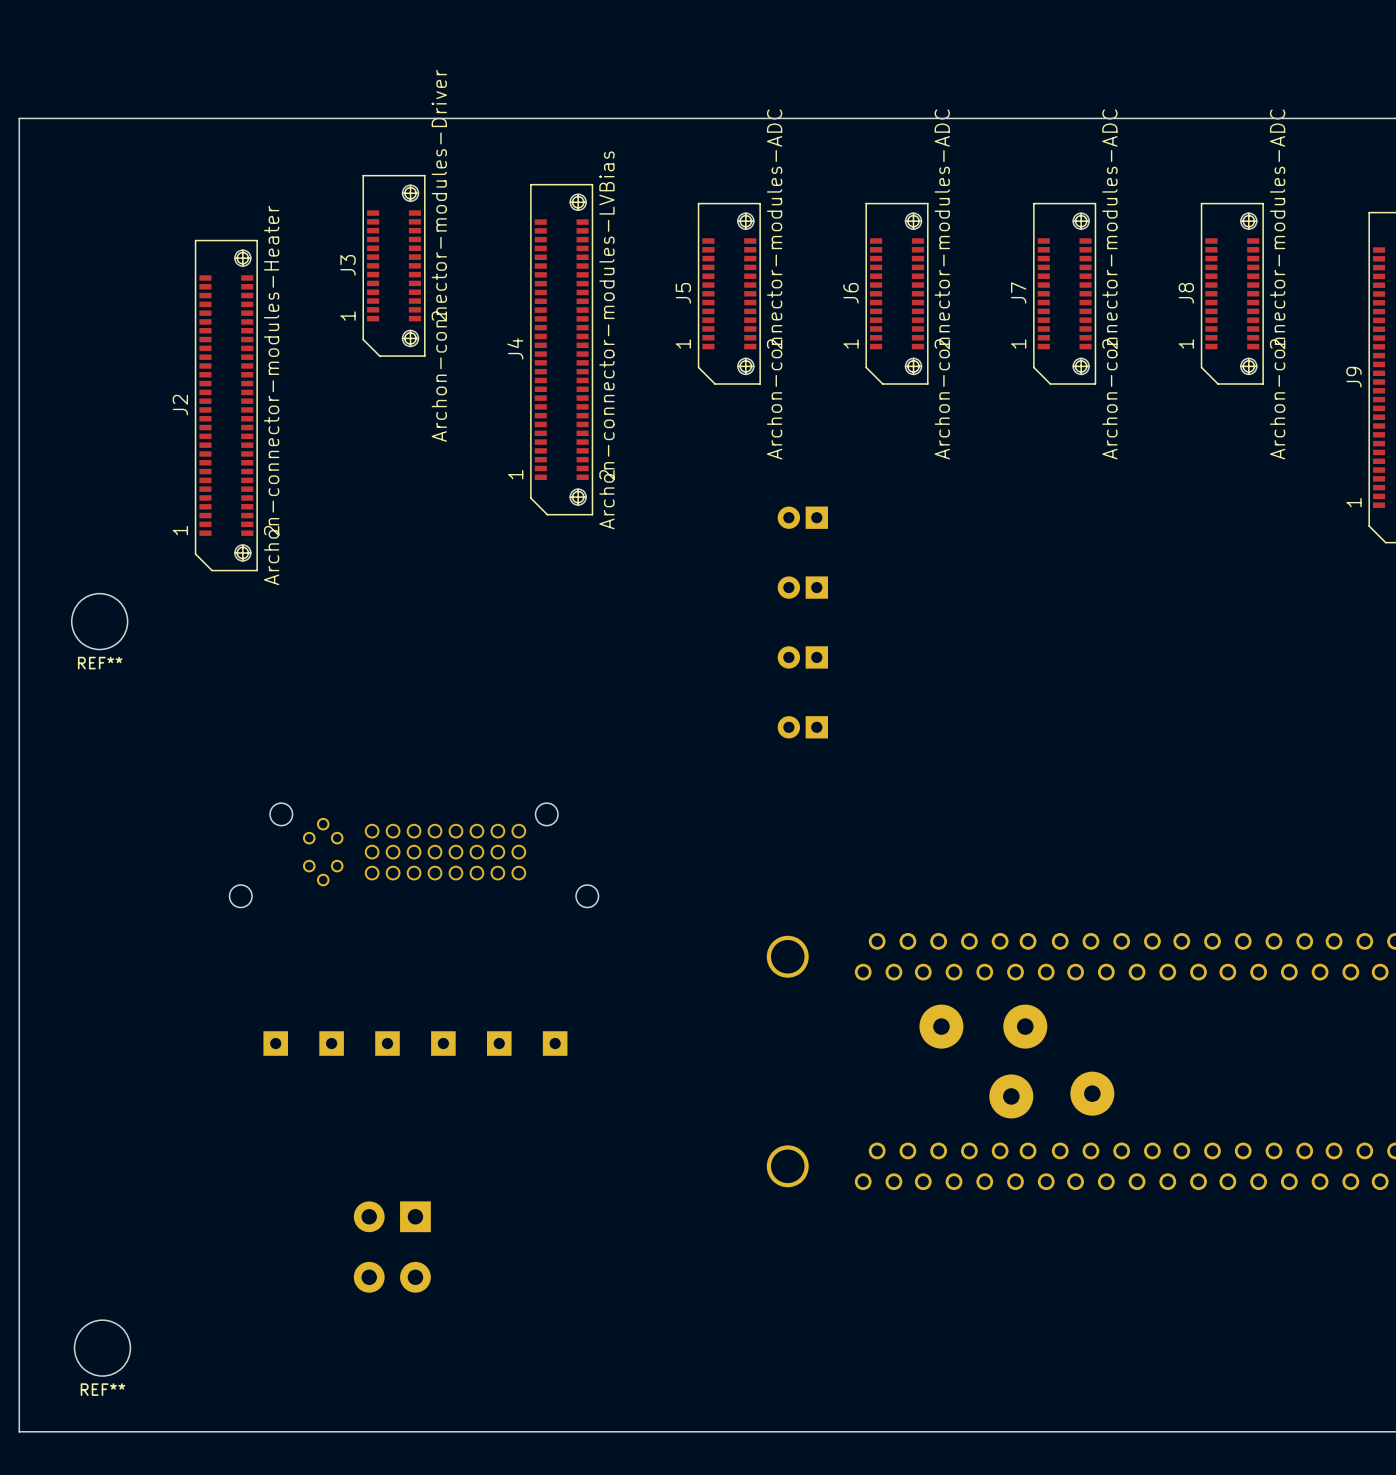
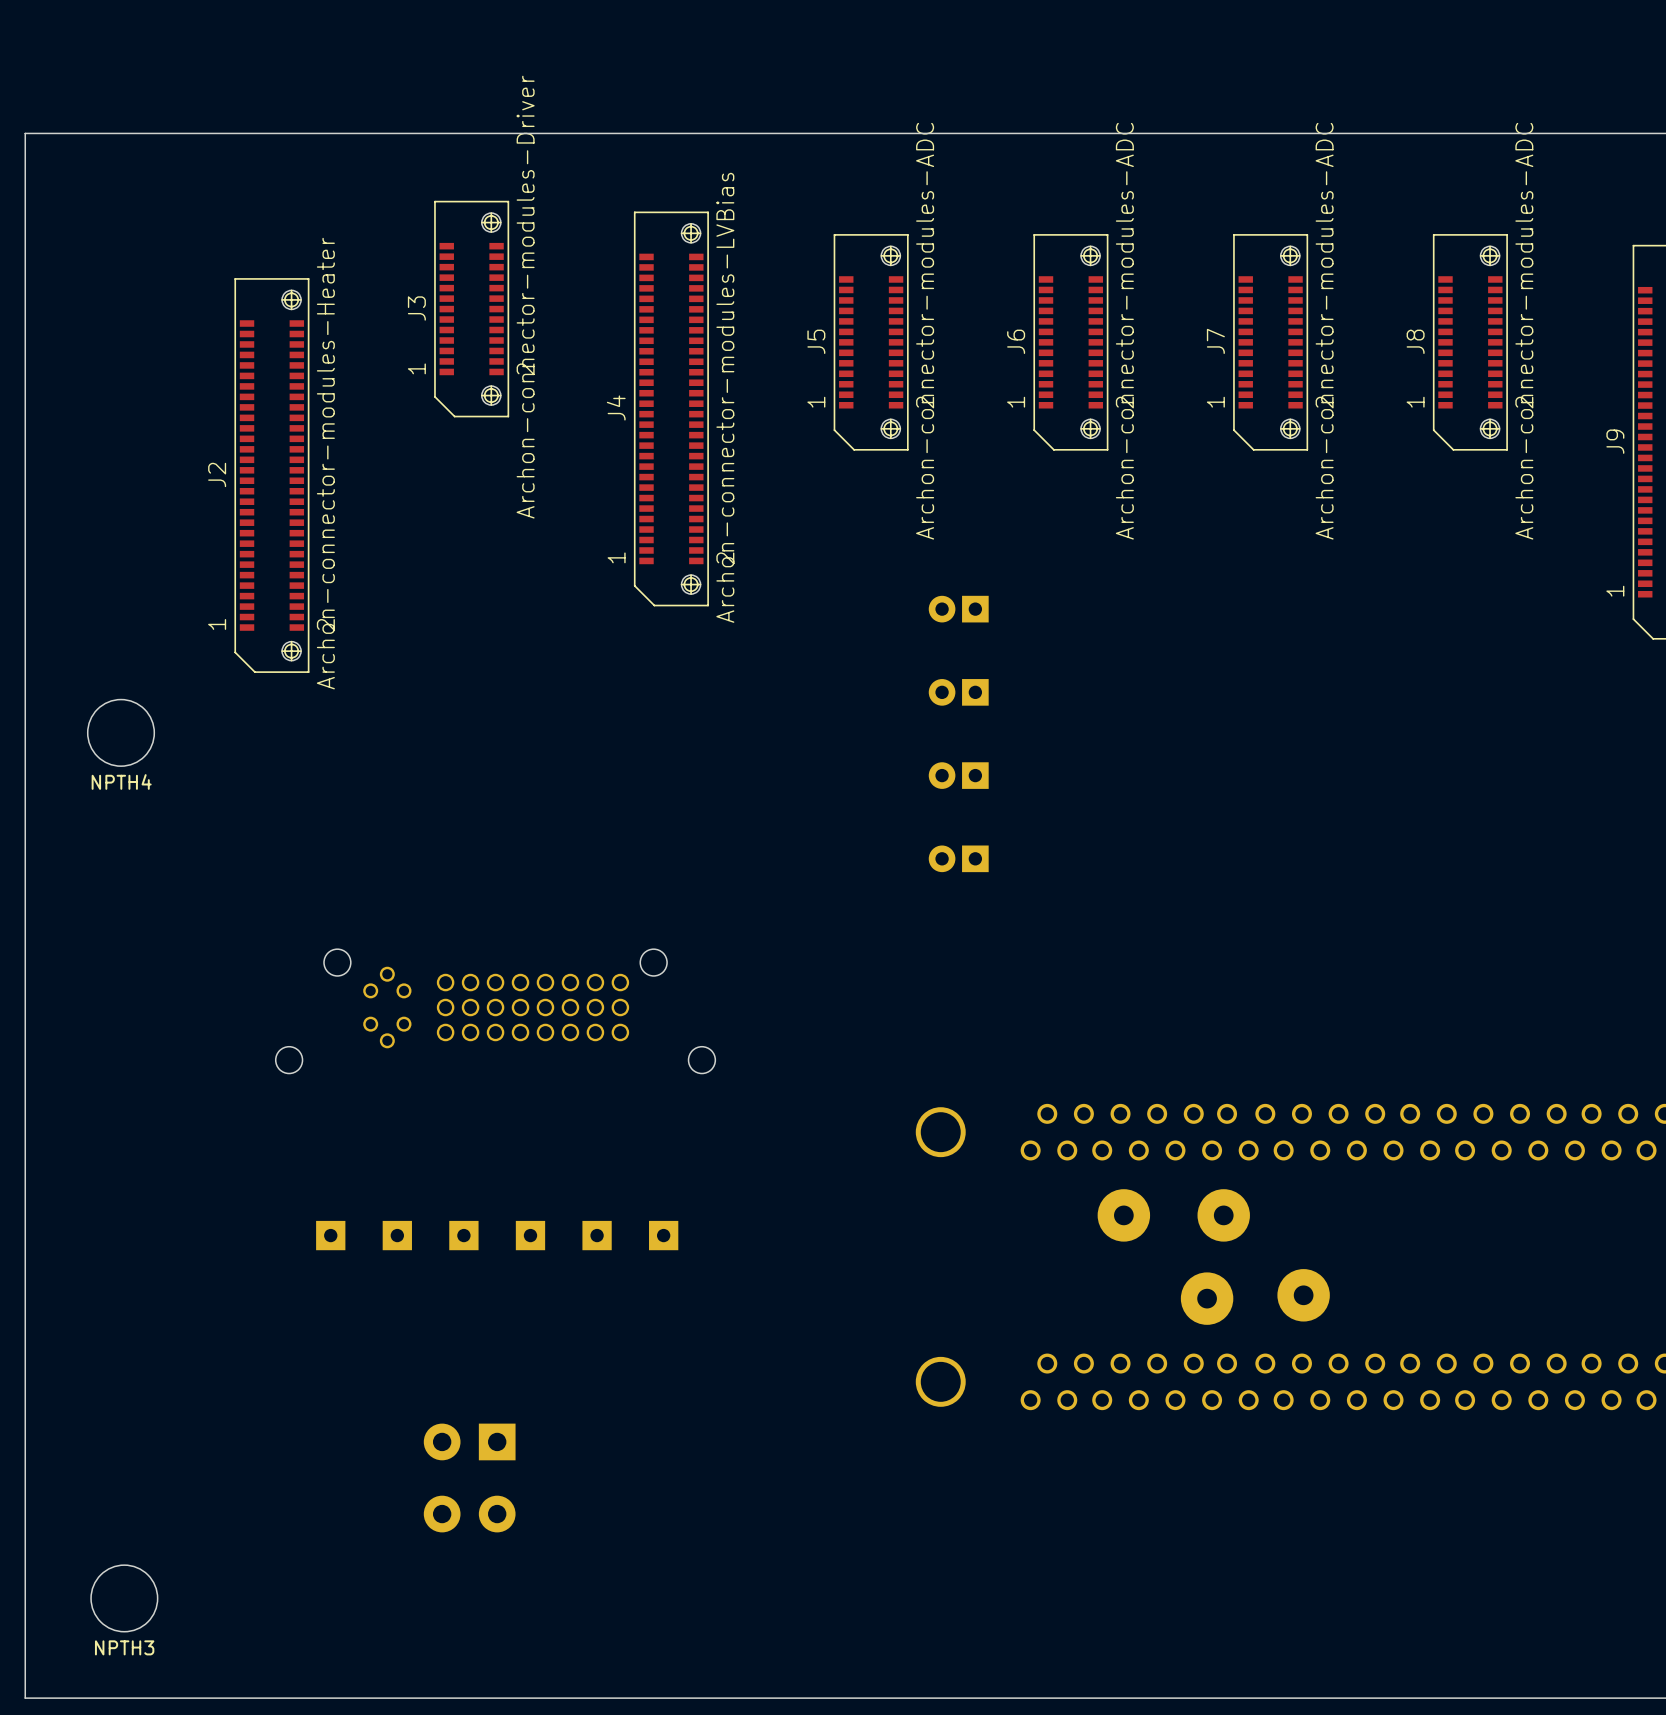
REF** name: REF** (100, 663) -> NPTH4 (121, 781)
REF** name: REF** (103, 1389) -> NPTH3 (124, 1647)

